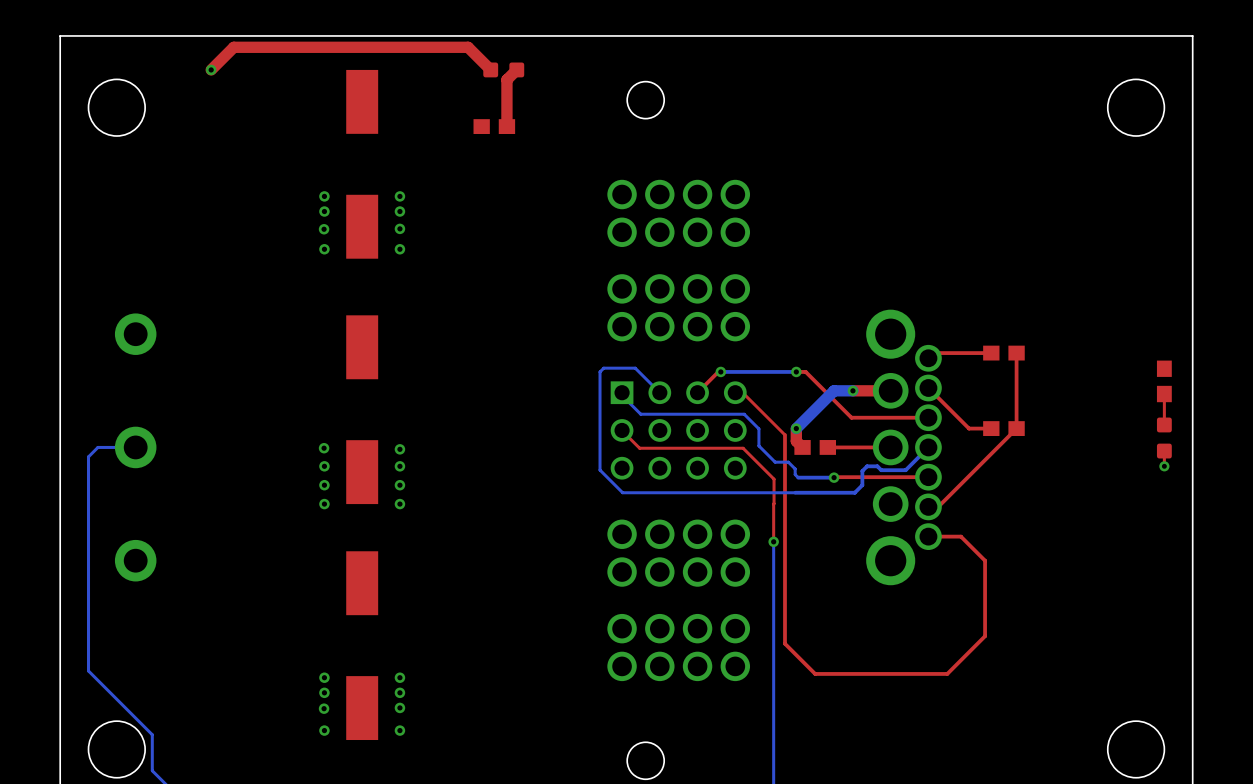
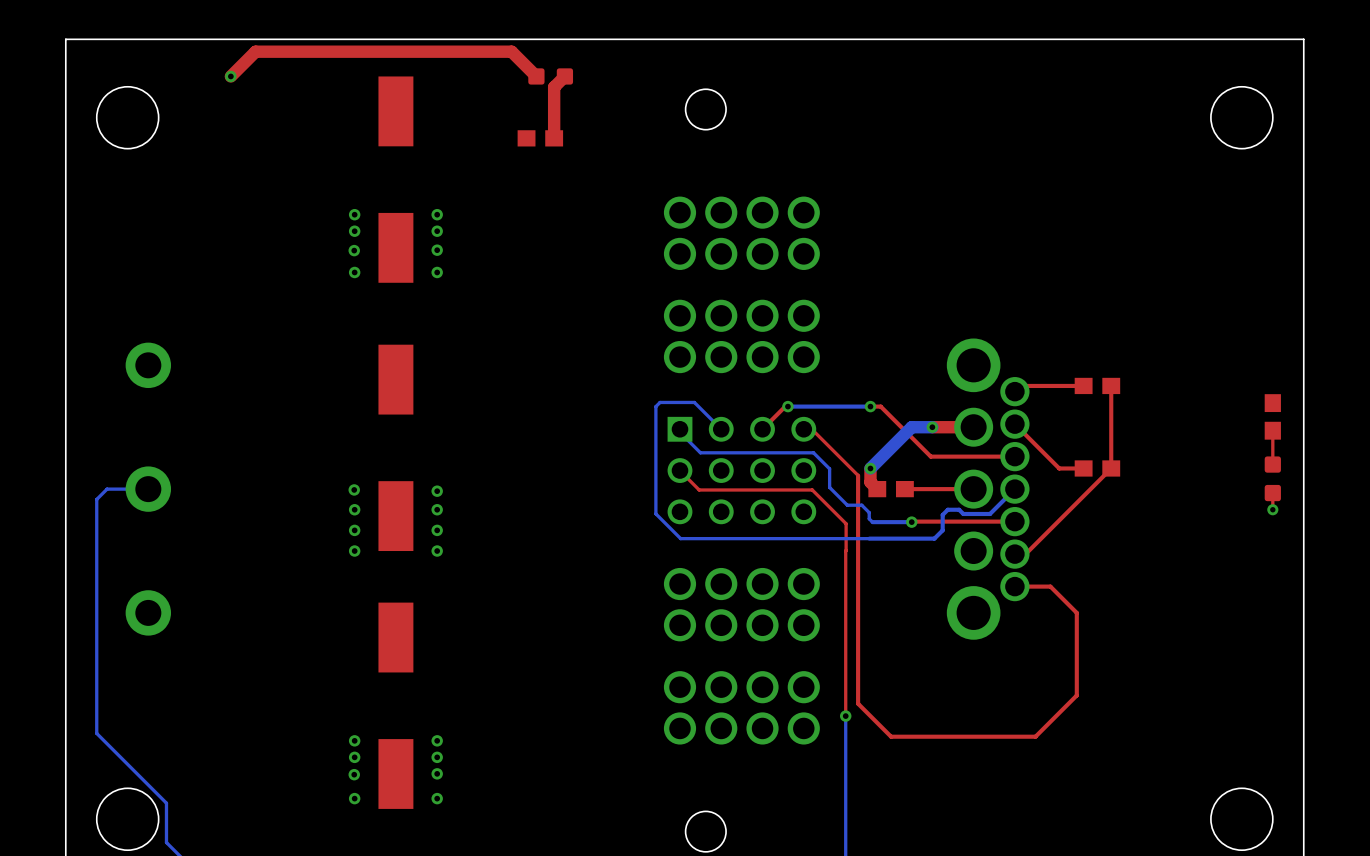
top track: none -> (845, 592) (845, 716)
bottom track: (773, 541) (773, 655) -> none
via: (773, 541) -> none
via: none -> (845, 716)

